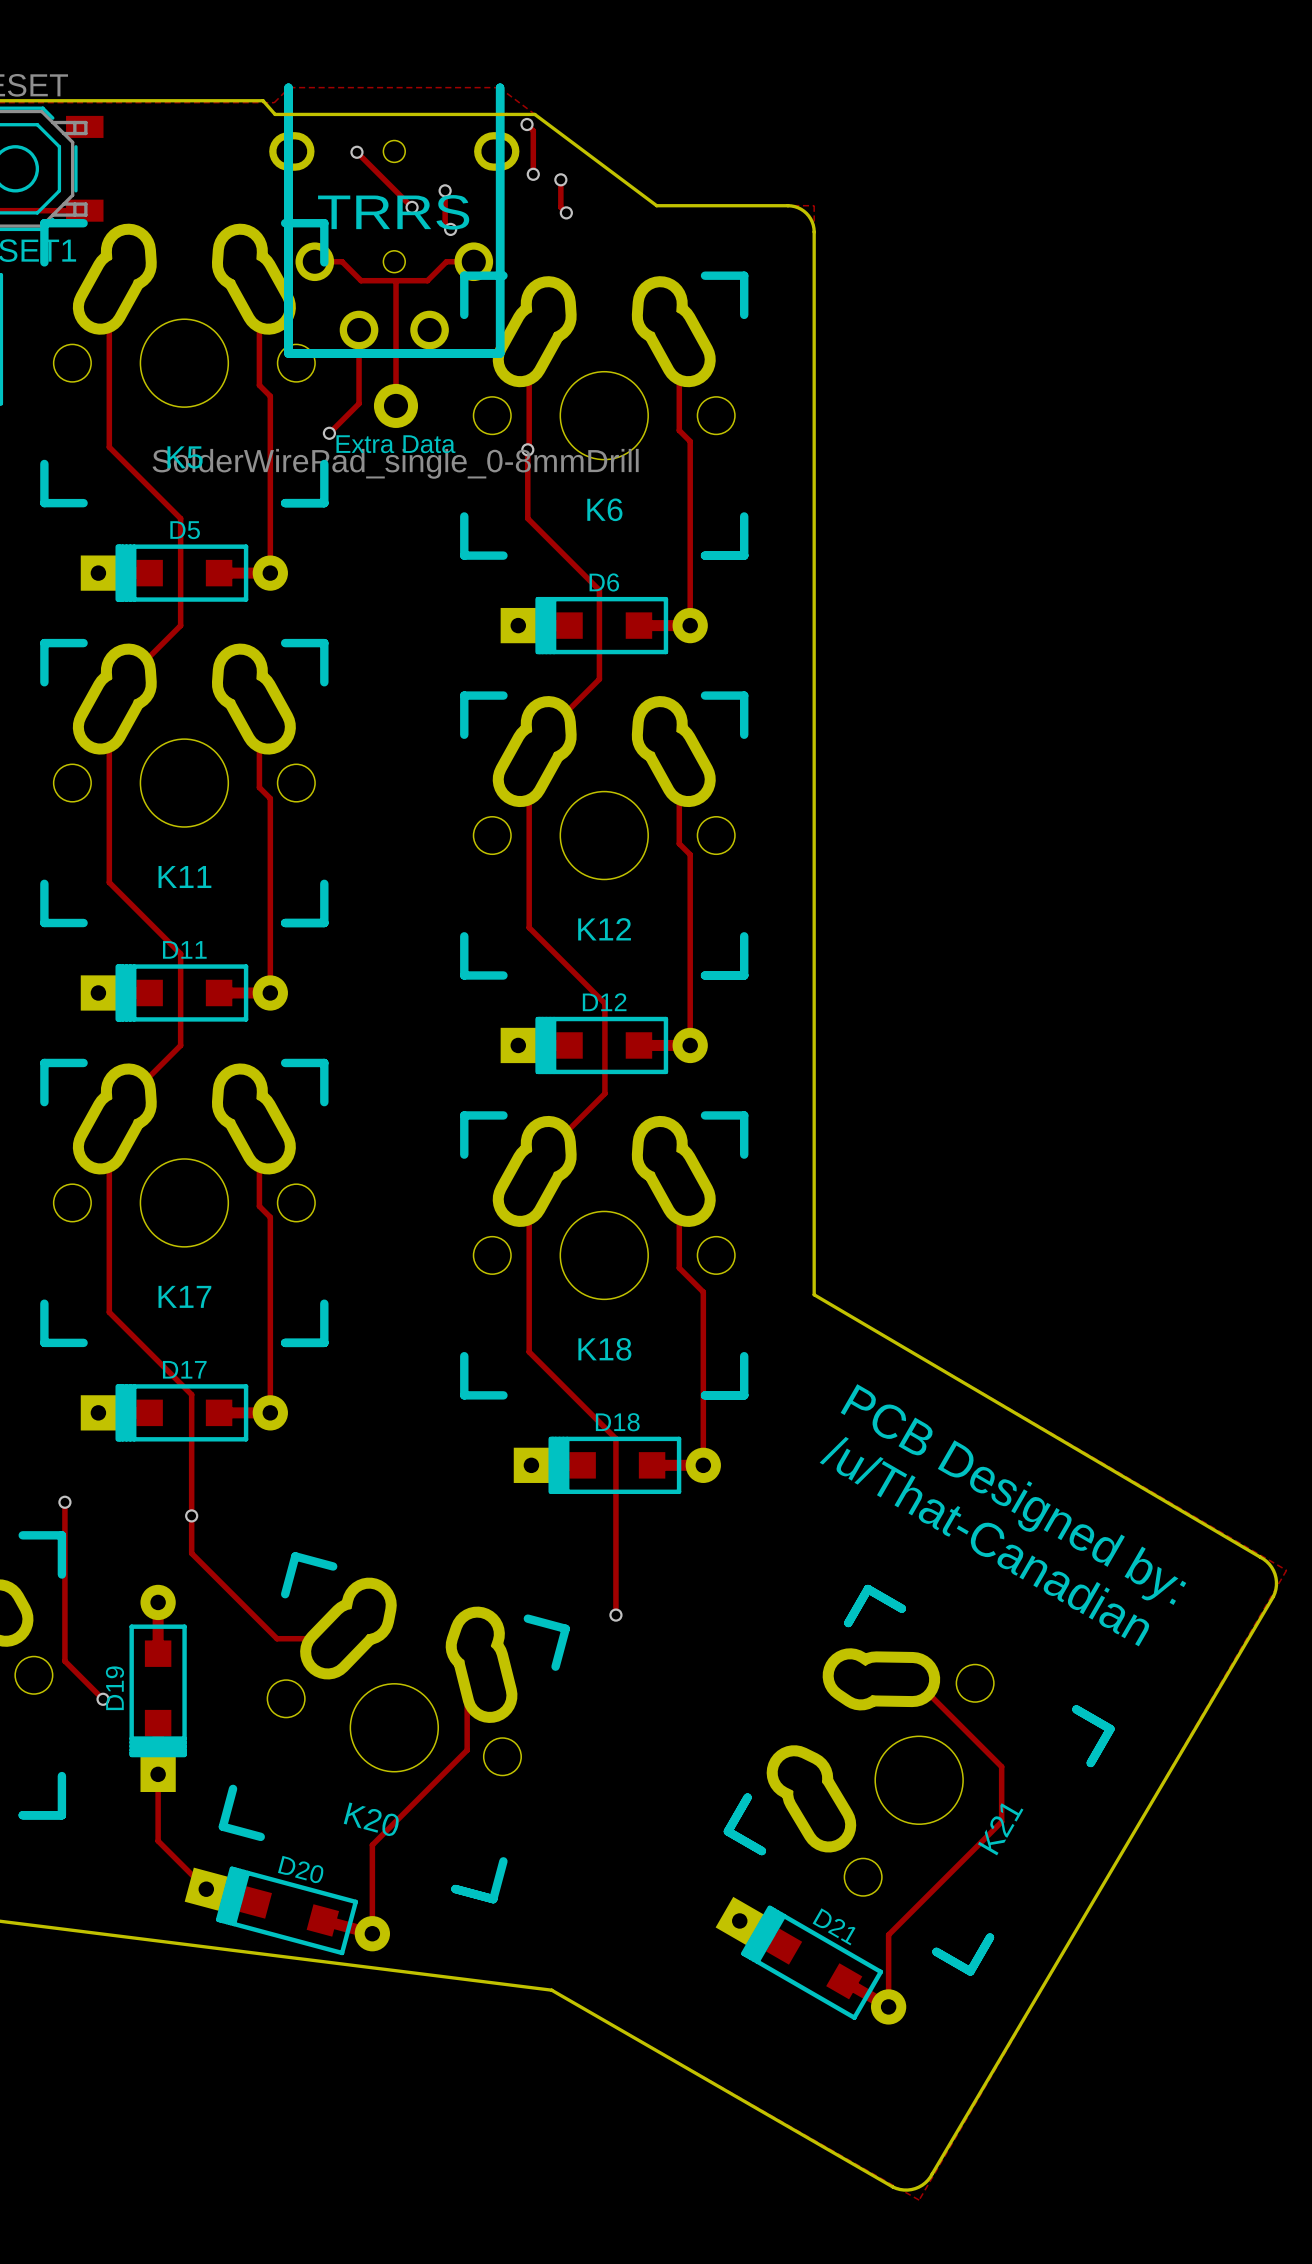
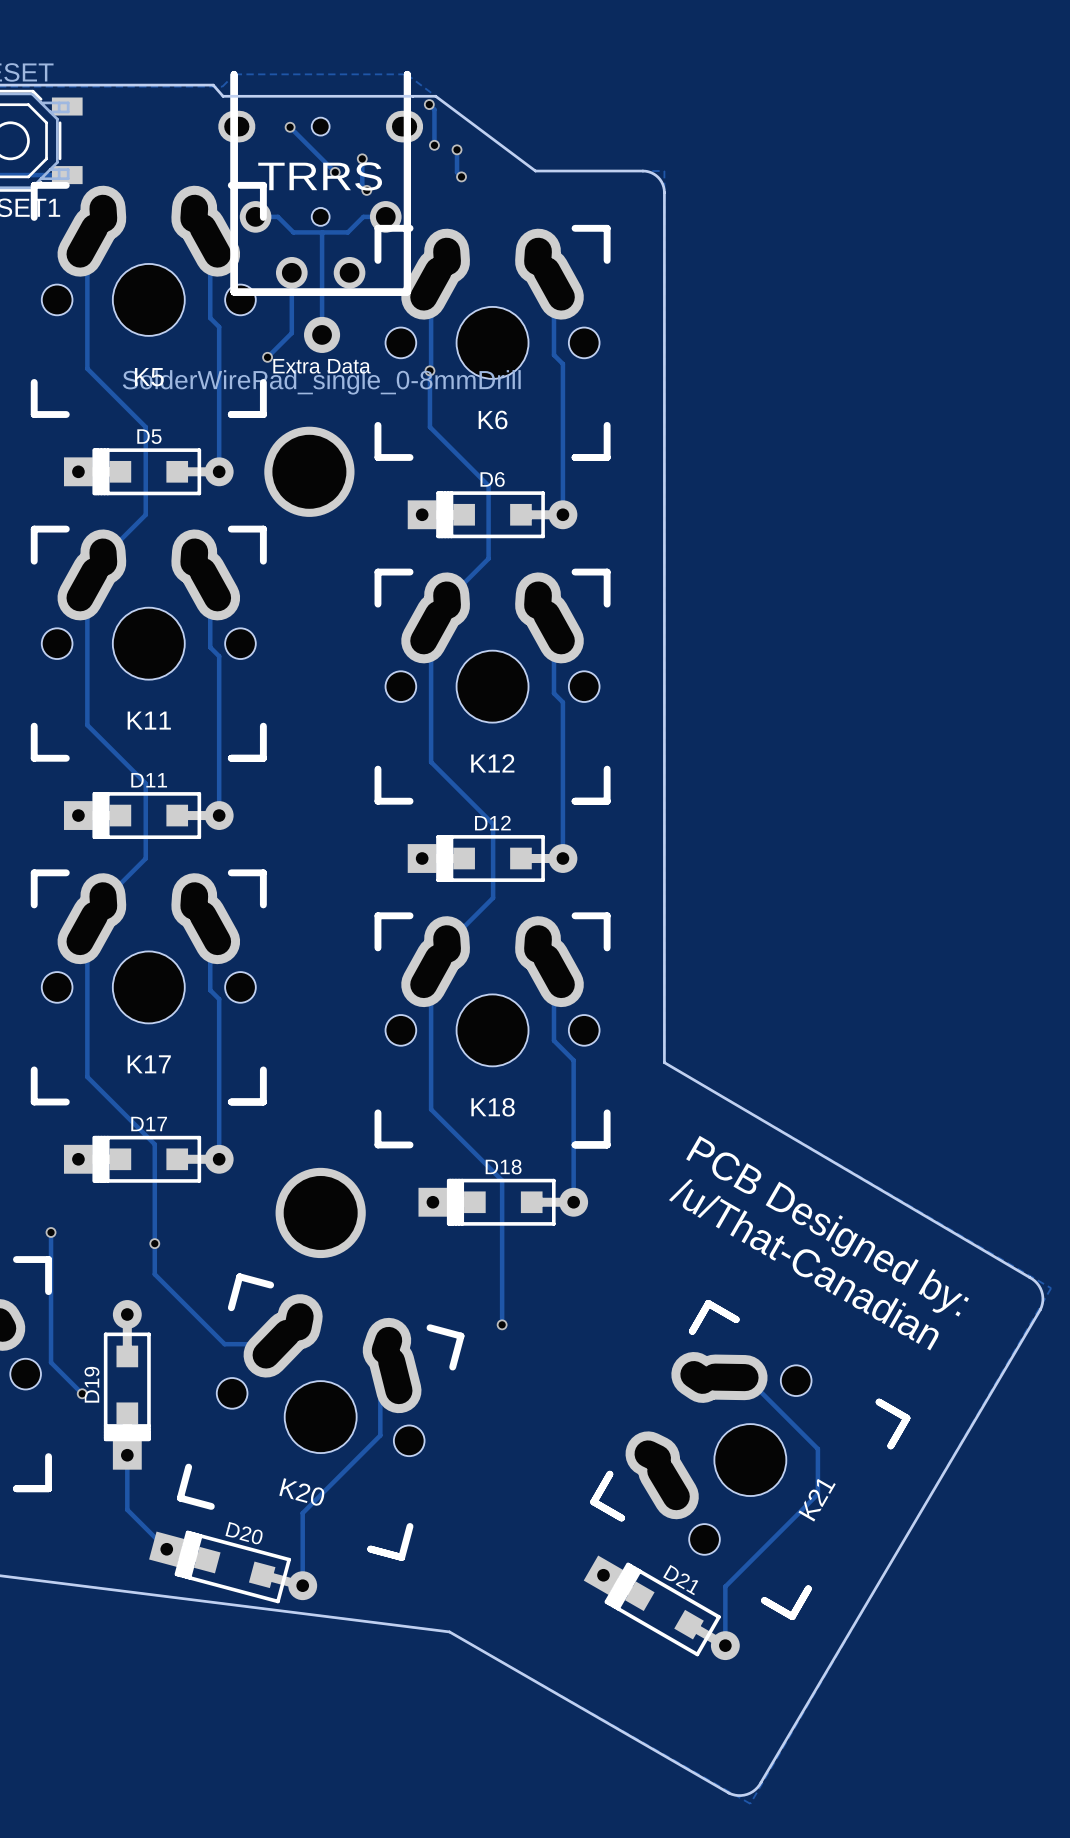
part: none -> (309, 471)
part: none -> (320, 1212)

